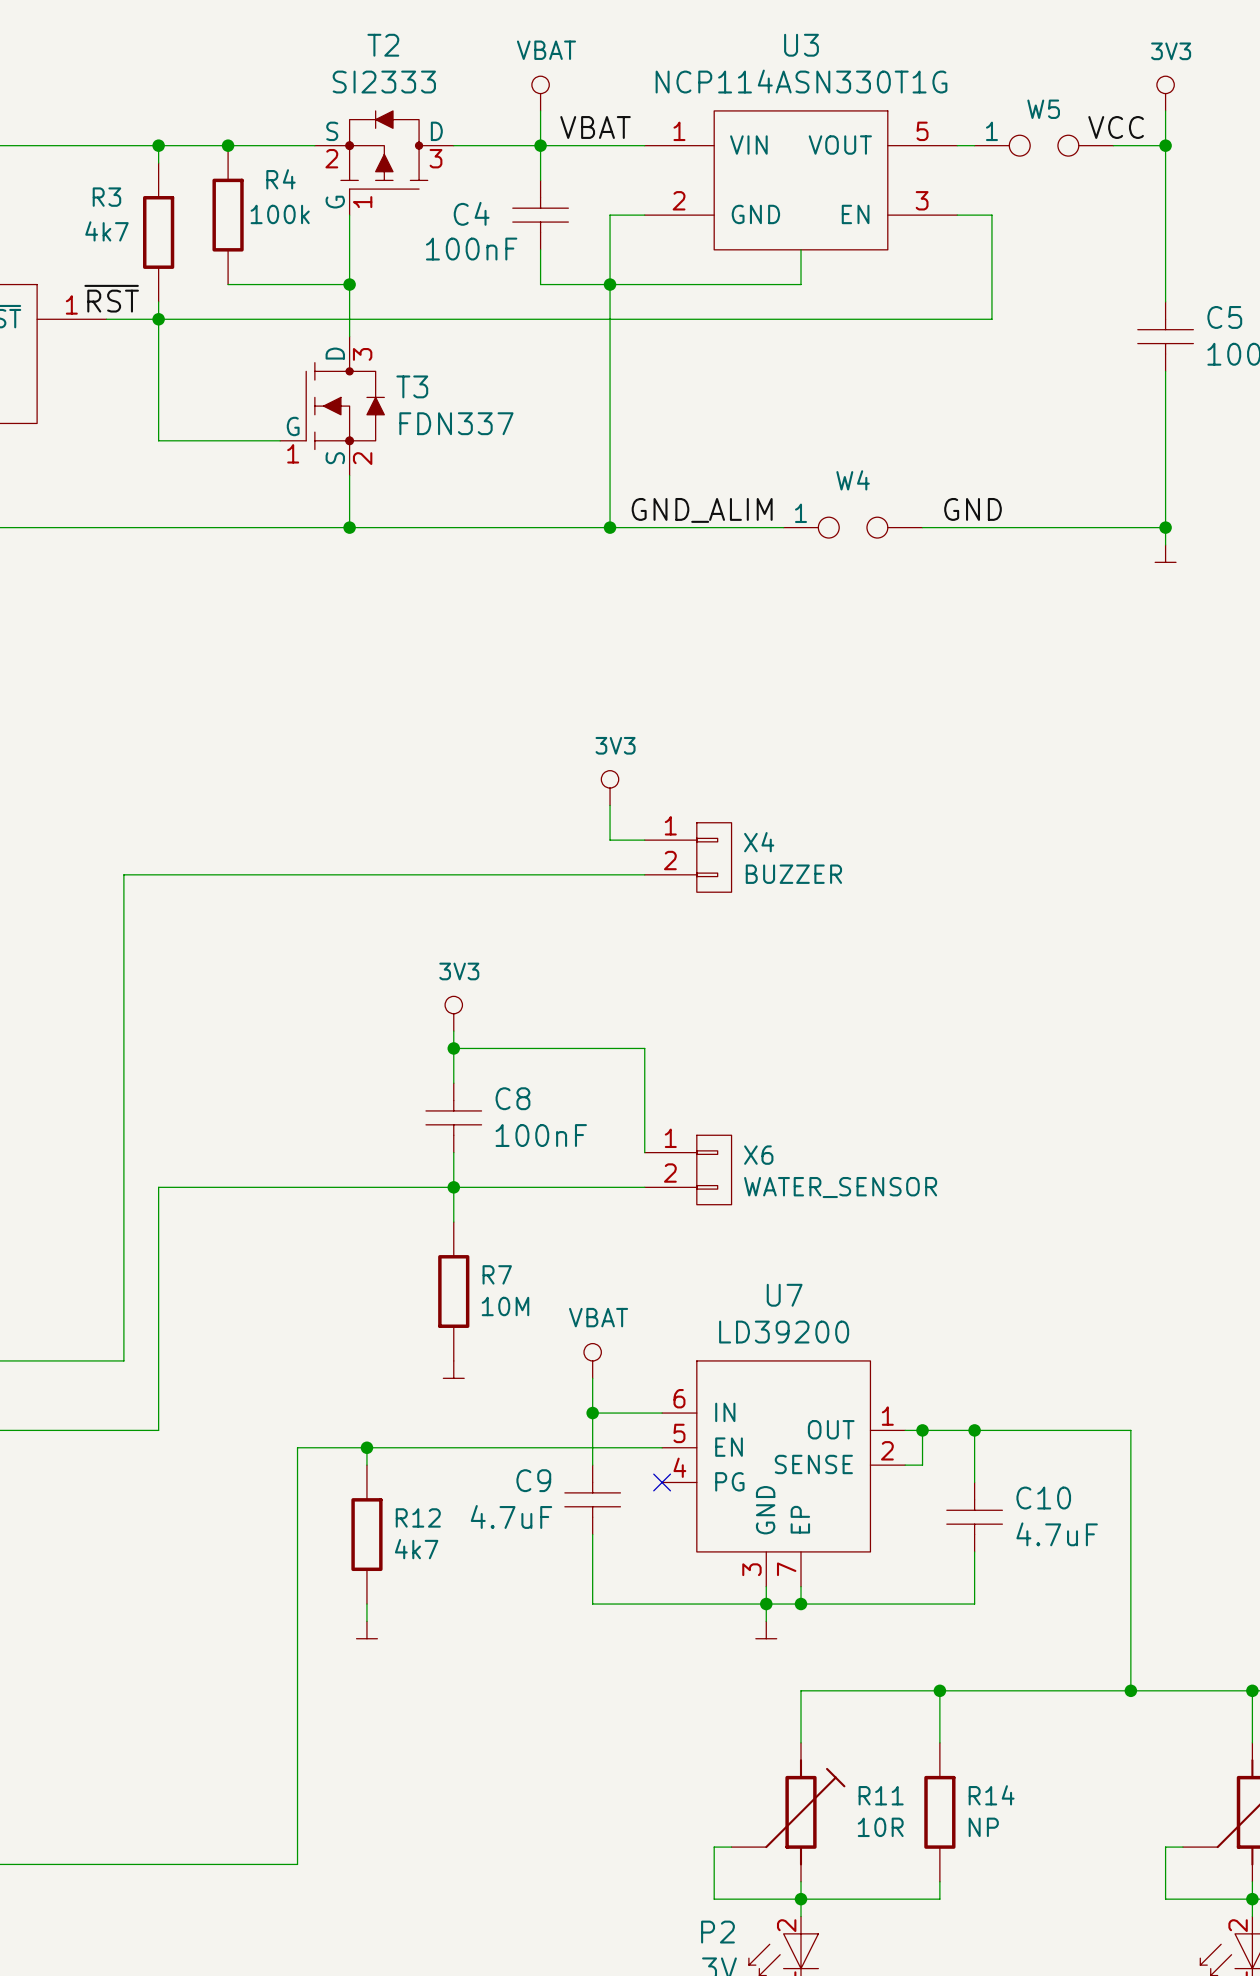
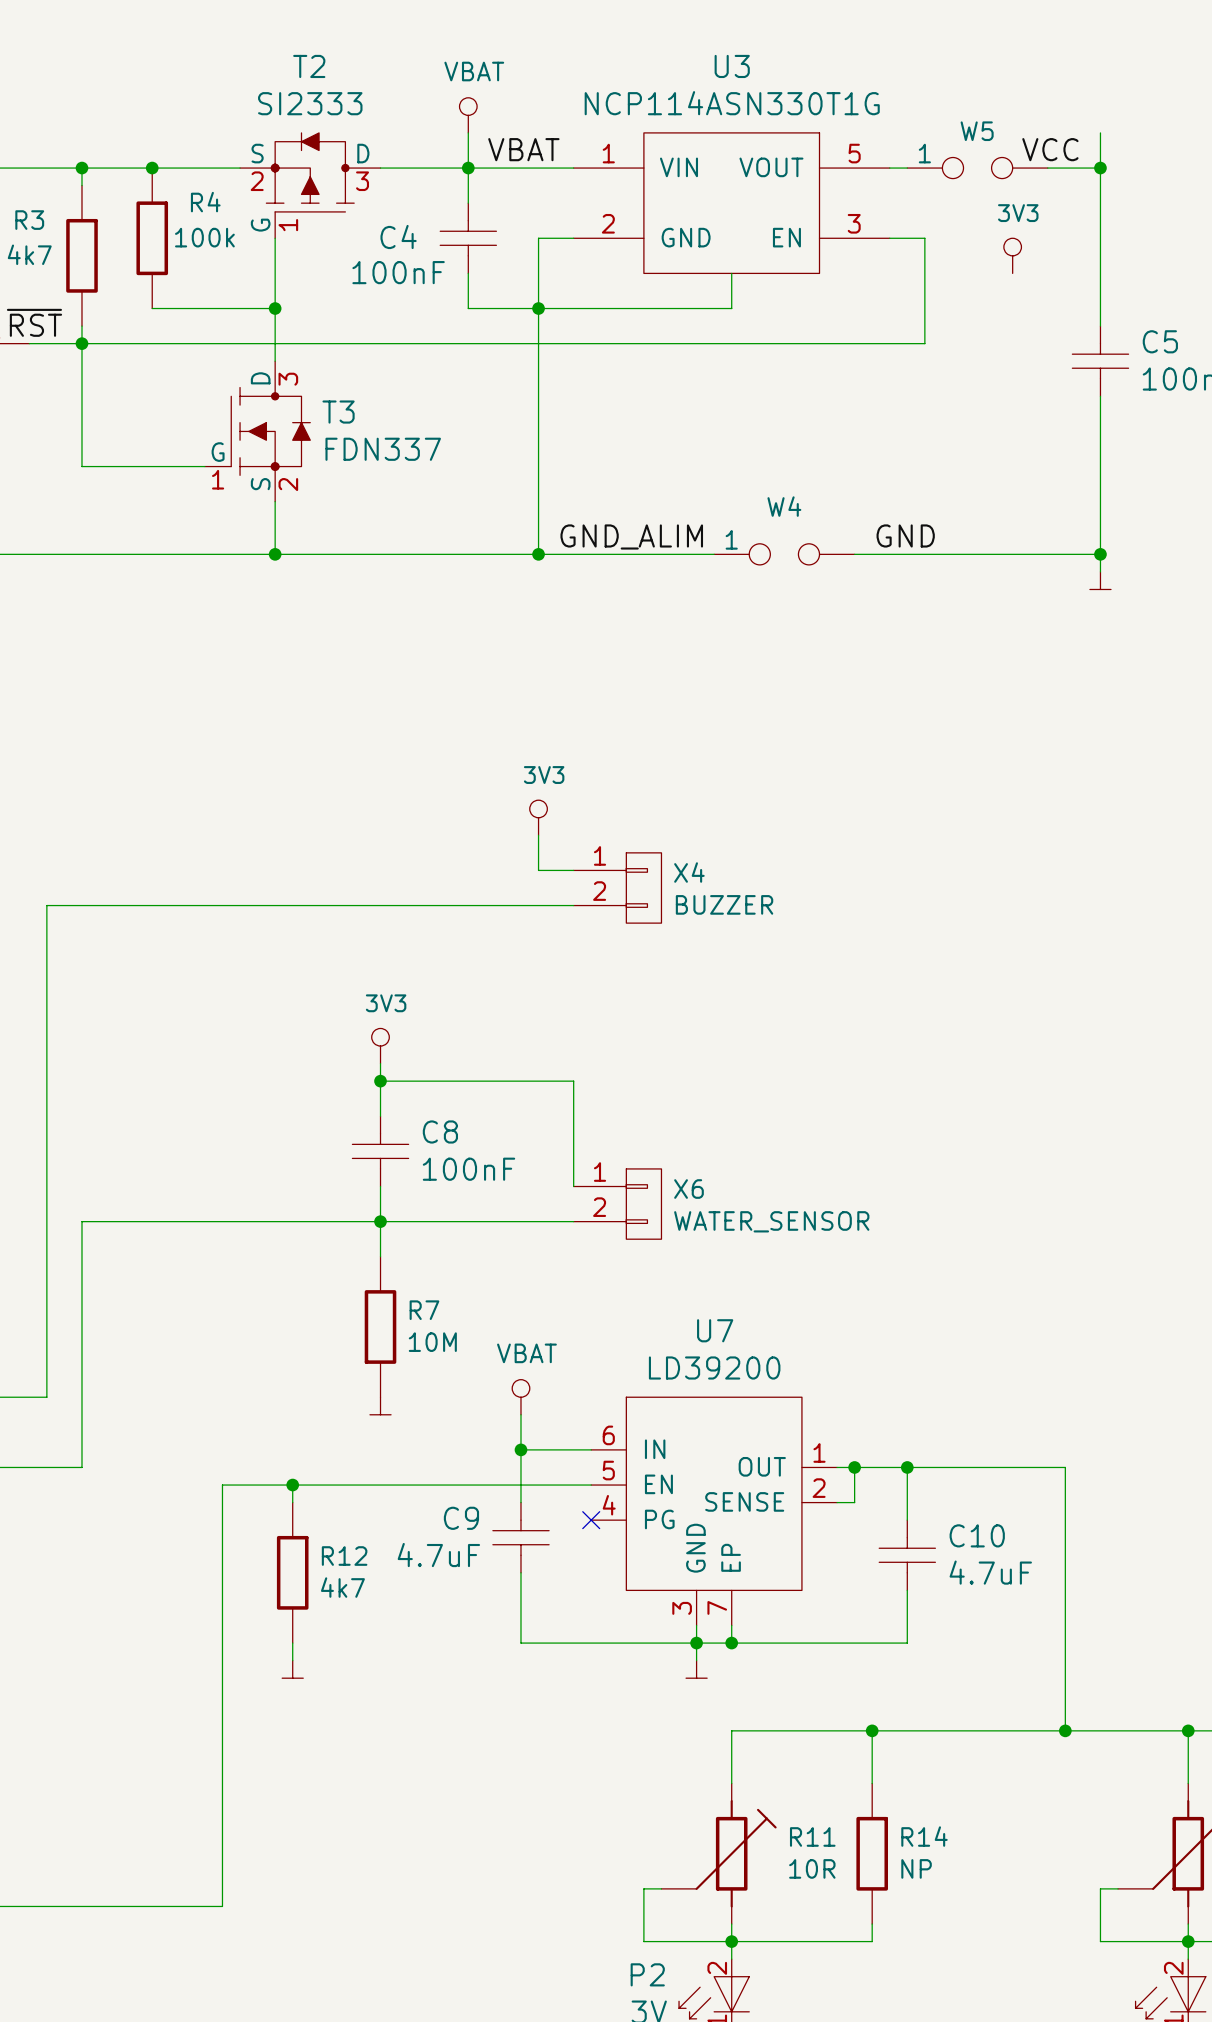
power symbol position: 3V3 (1165, 93) -> 3V3 (1012, 255)

